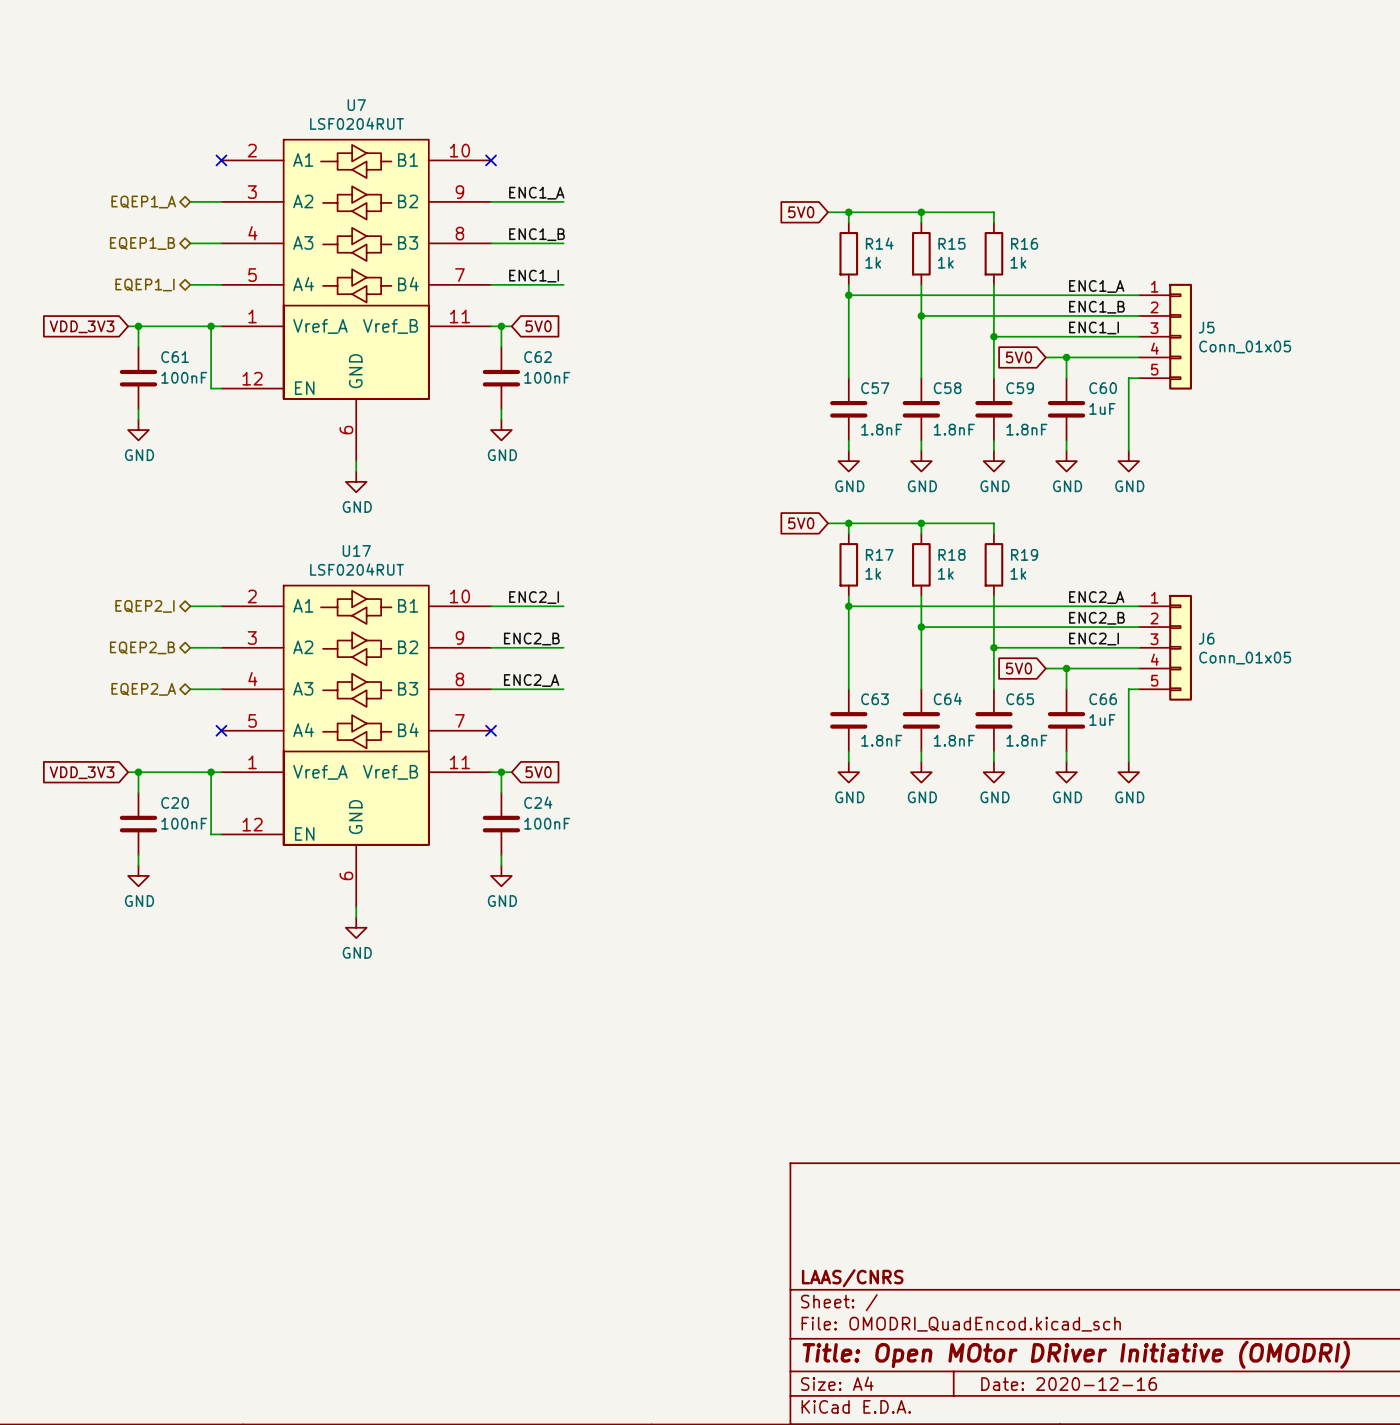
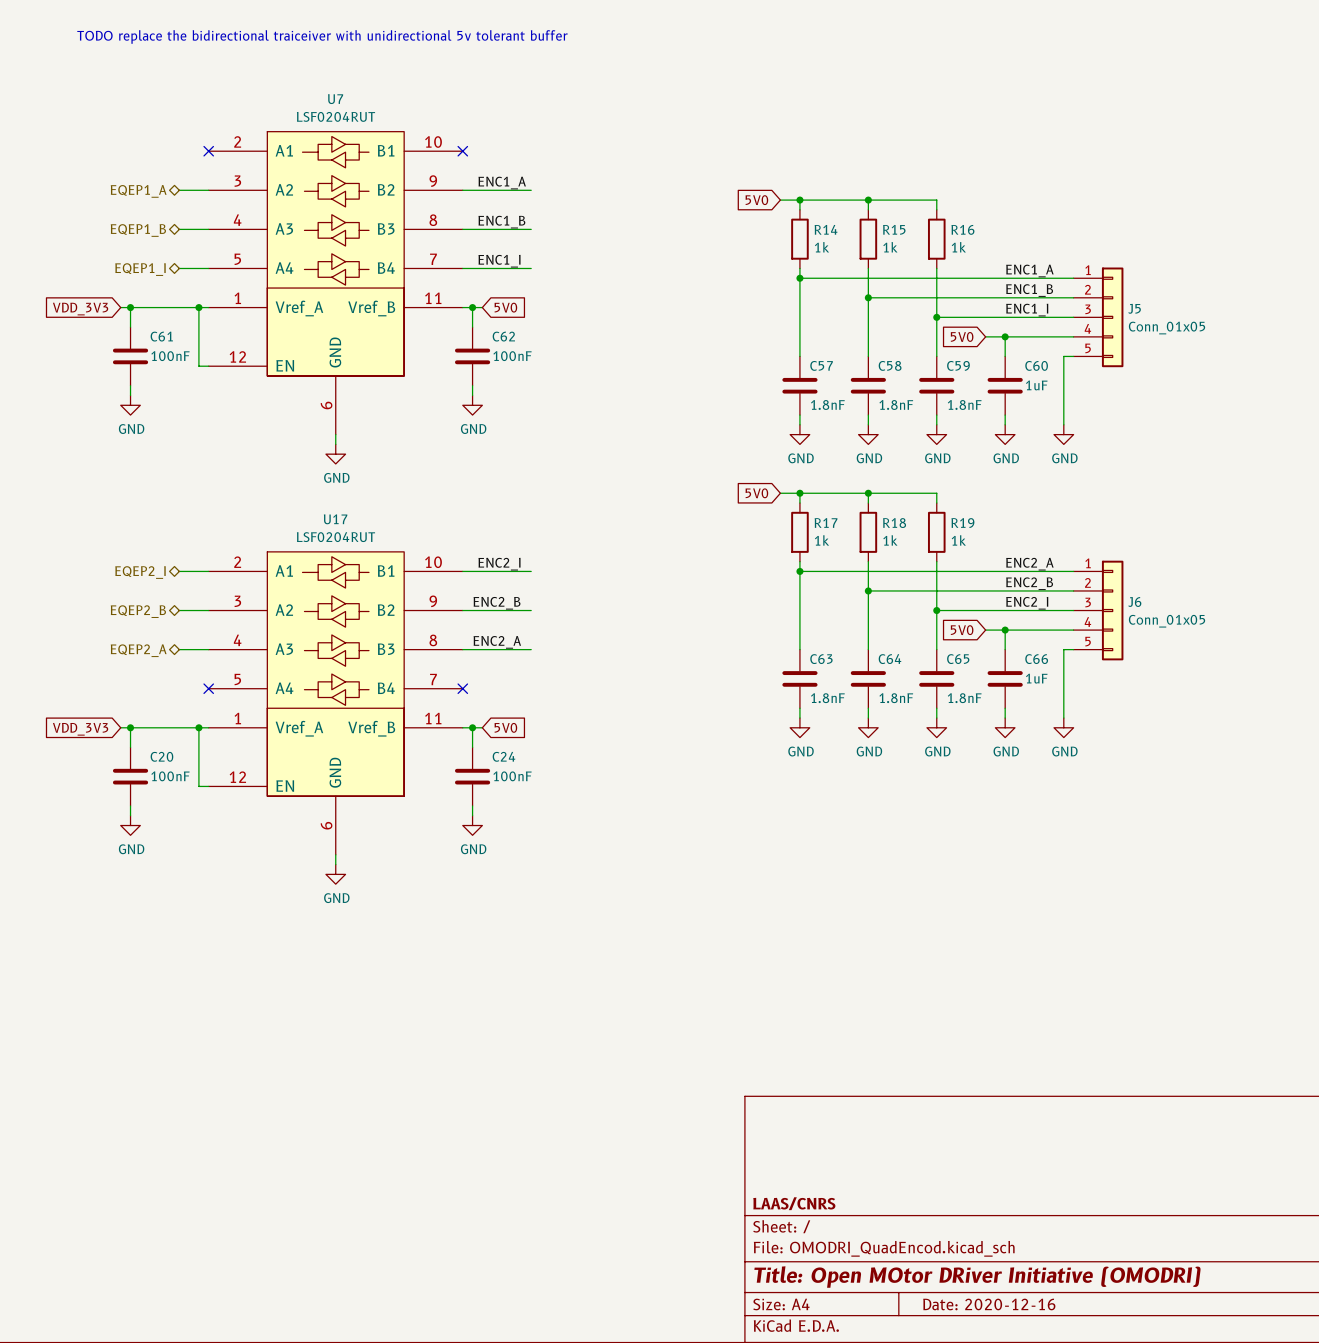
text: none -> TODO replace the bidirectional traiceiver with unidirectional 5v tolerant buffer (322, 36)

